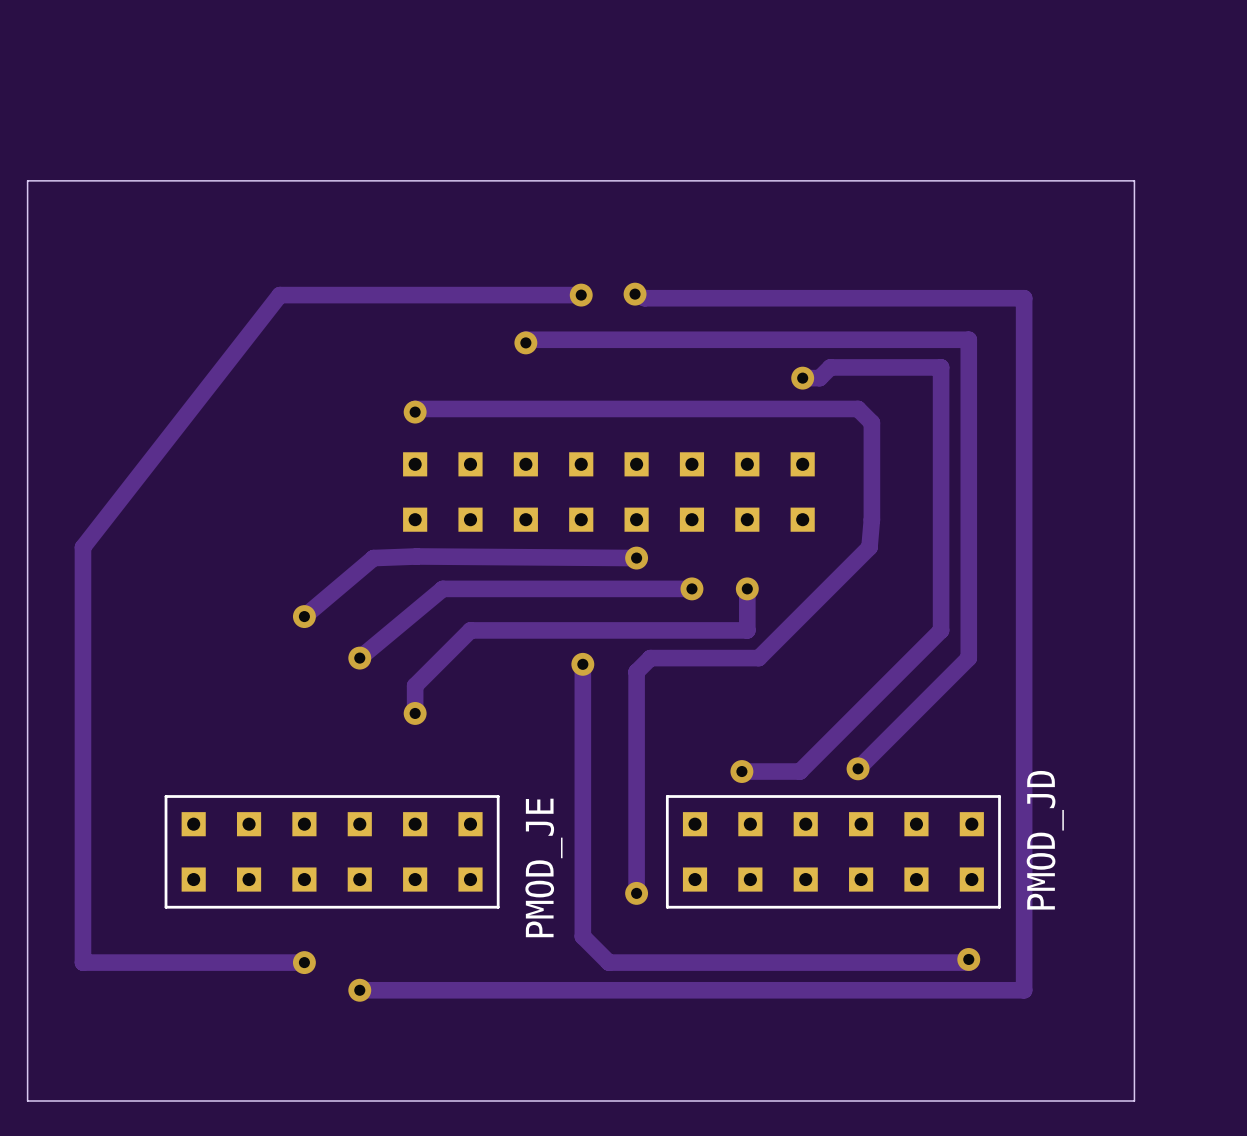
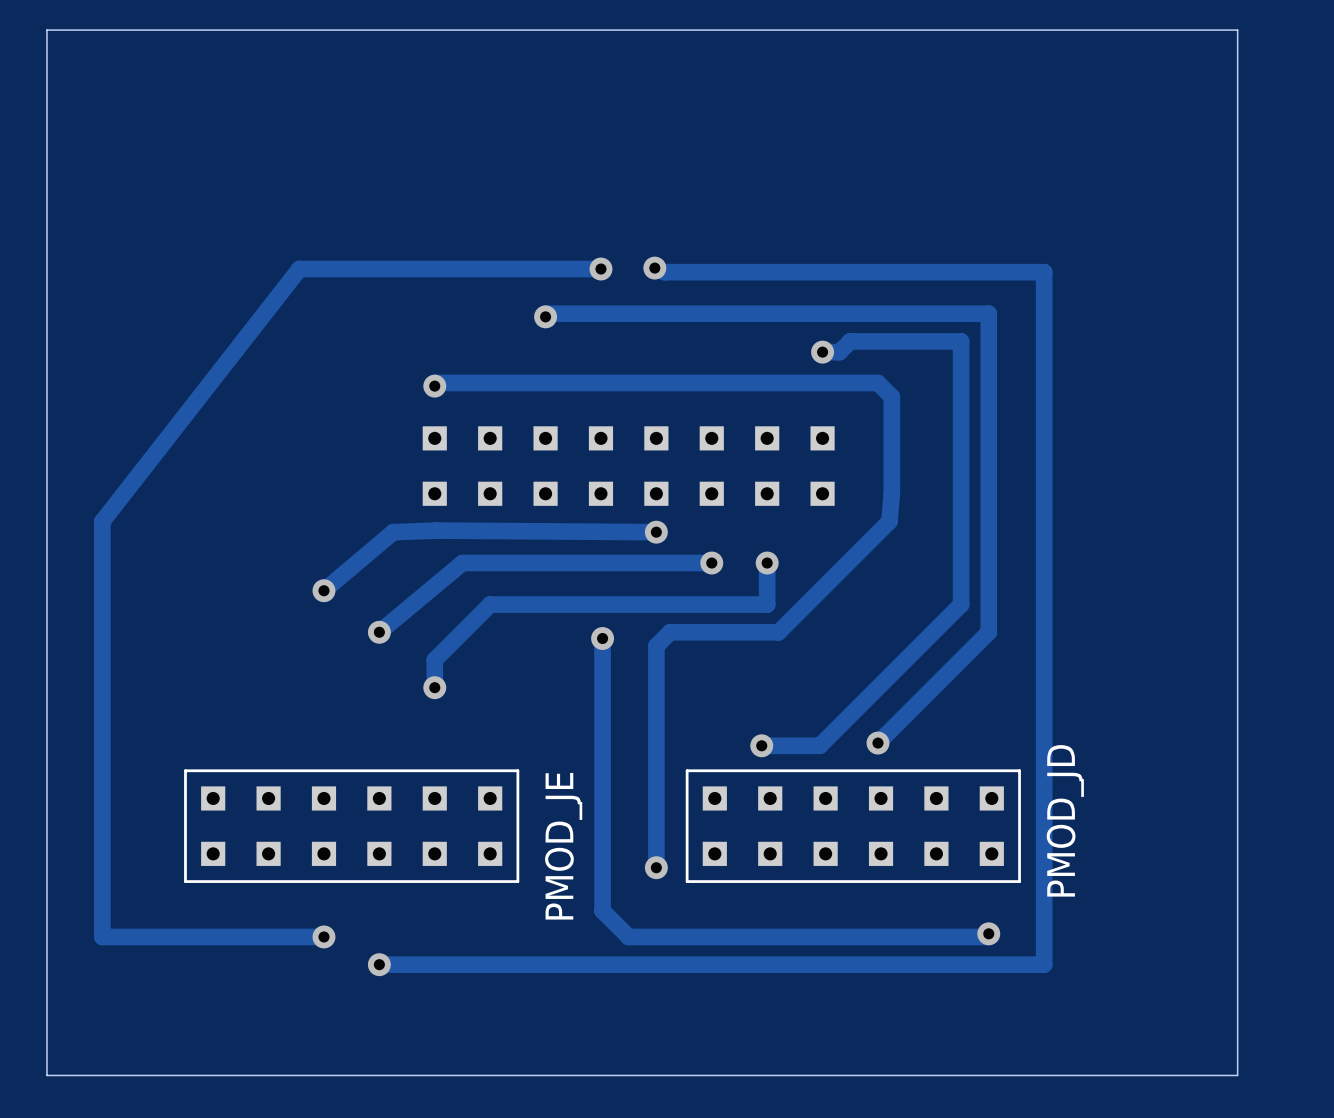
board edge: (27, 180) (1134, 180) (1134, 1101) -> (46, 154) (46, 30) (1237, 30) (1237, 1075) (1154, 1075)

